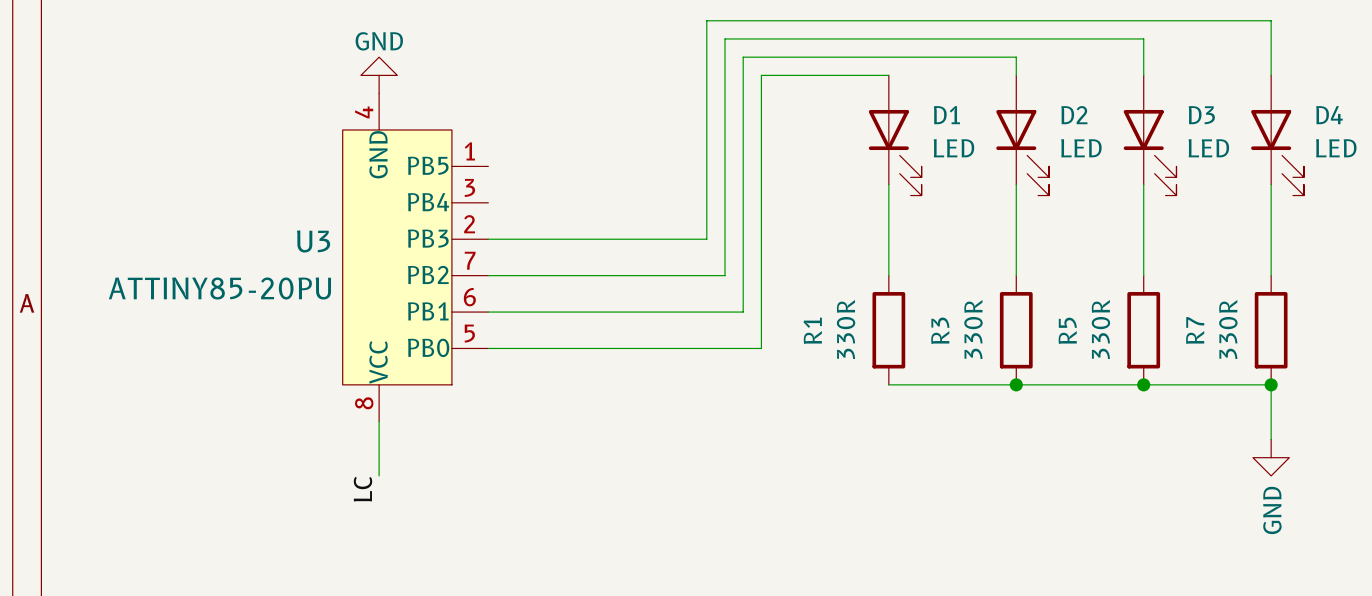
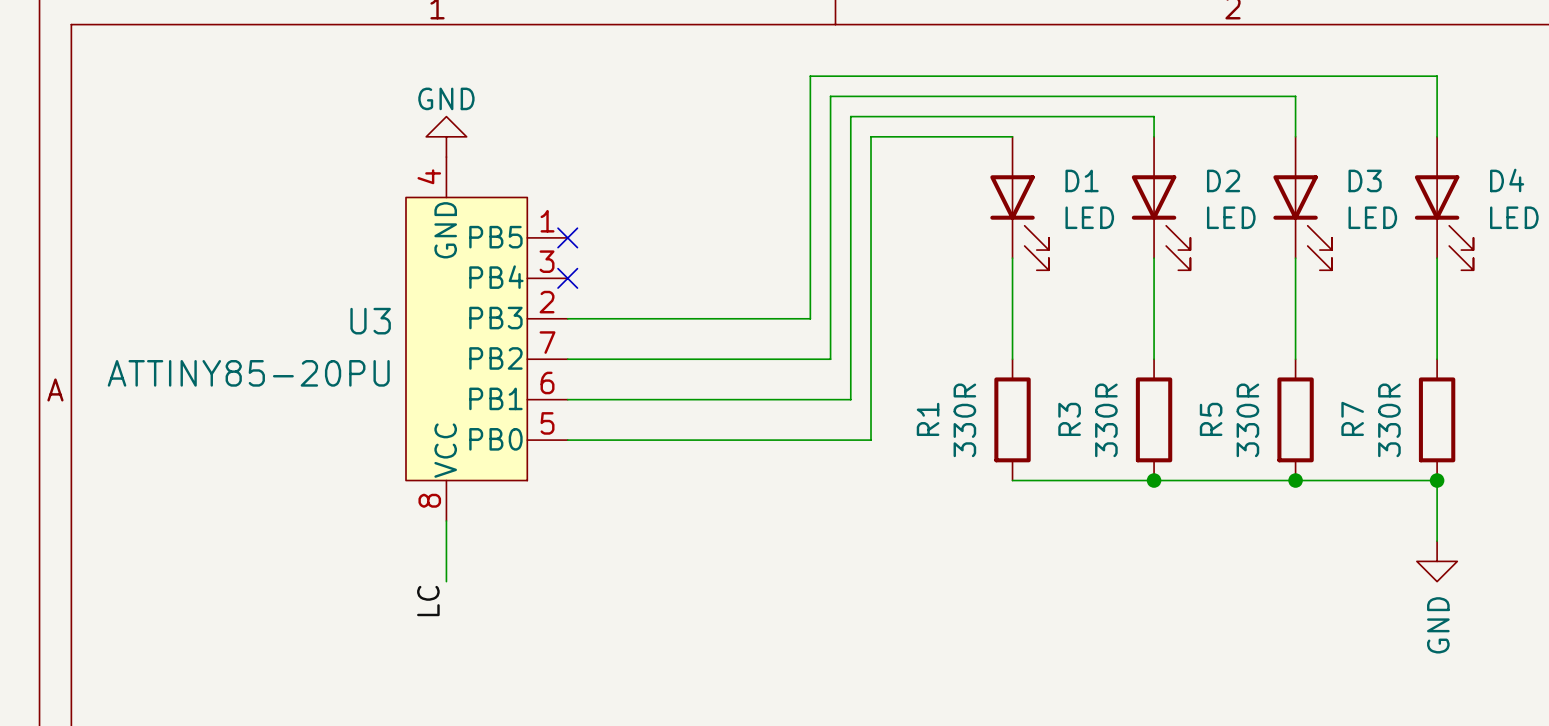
no-connect mark: none -> (567, 237)
no-connect mark: none -> (567, 278)

